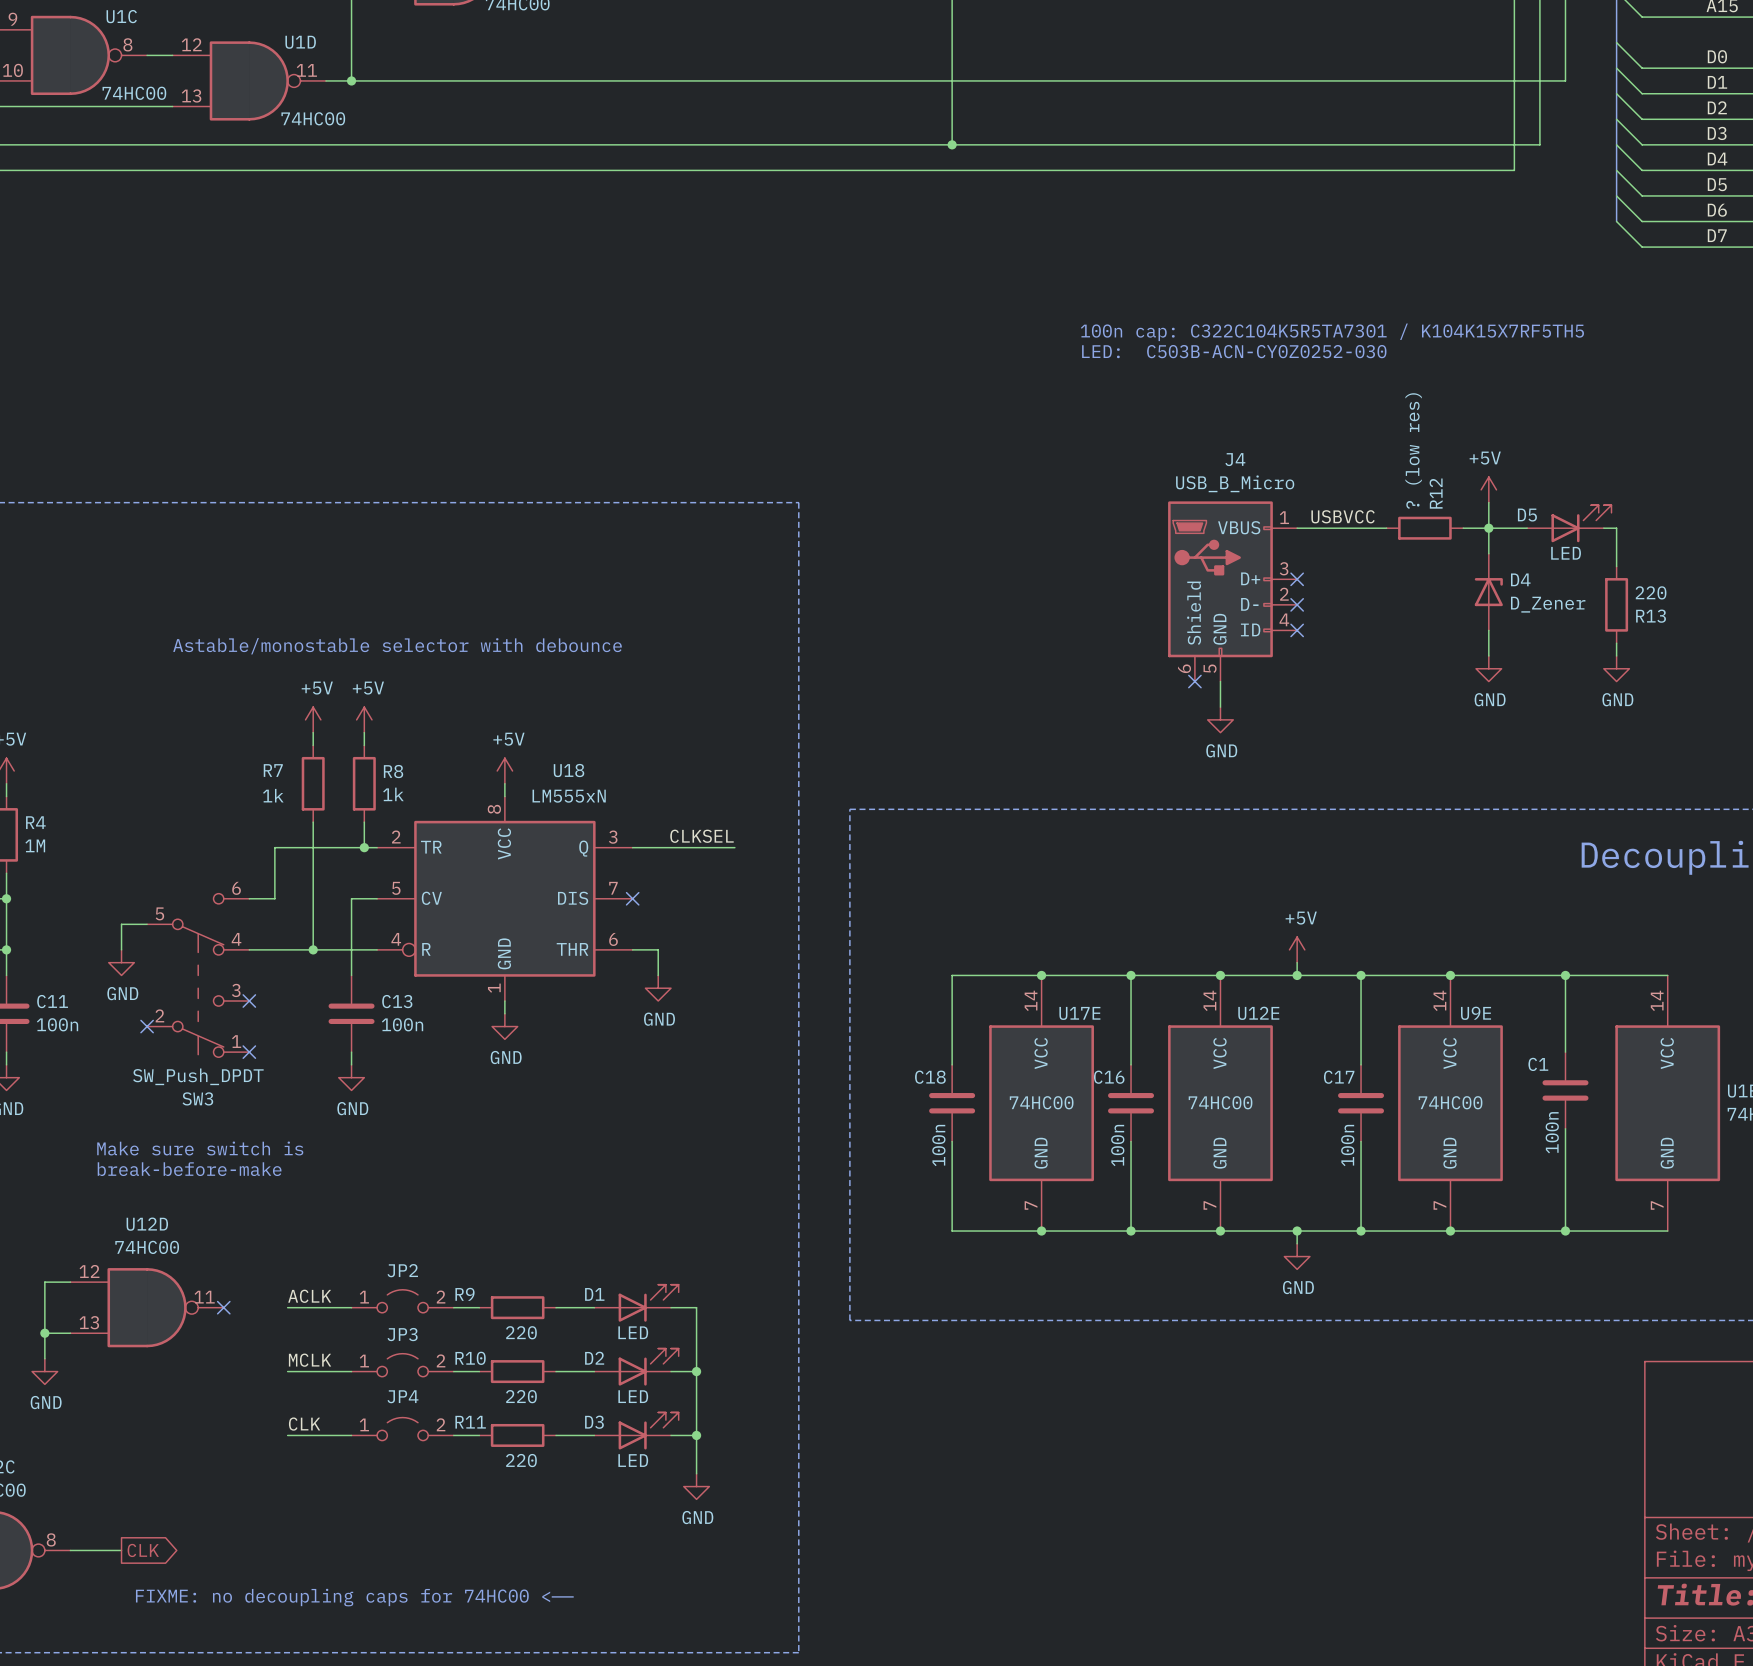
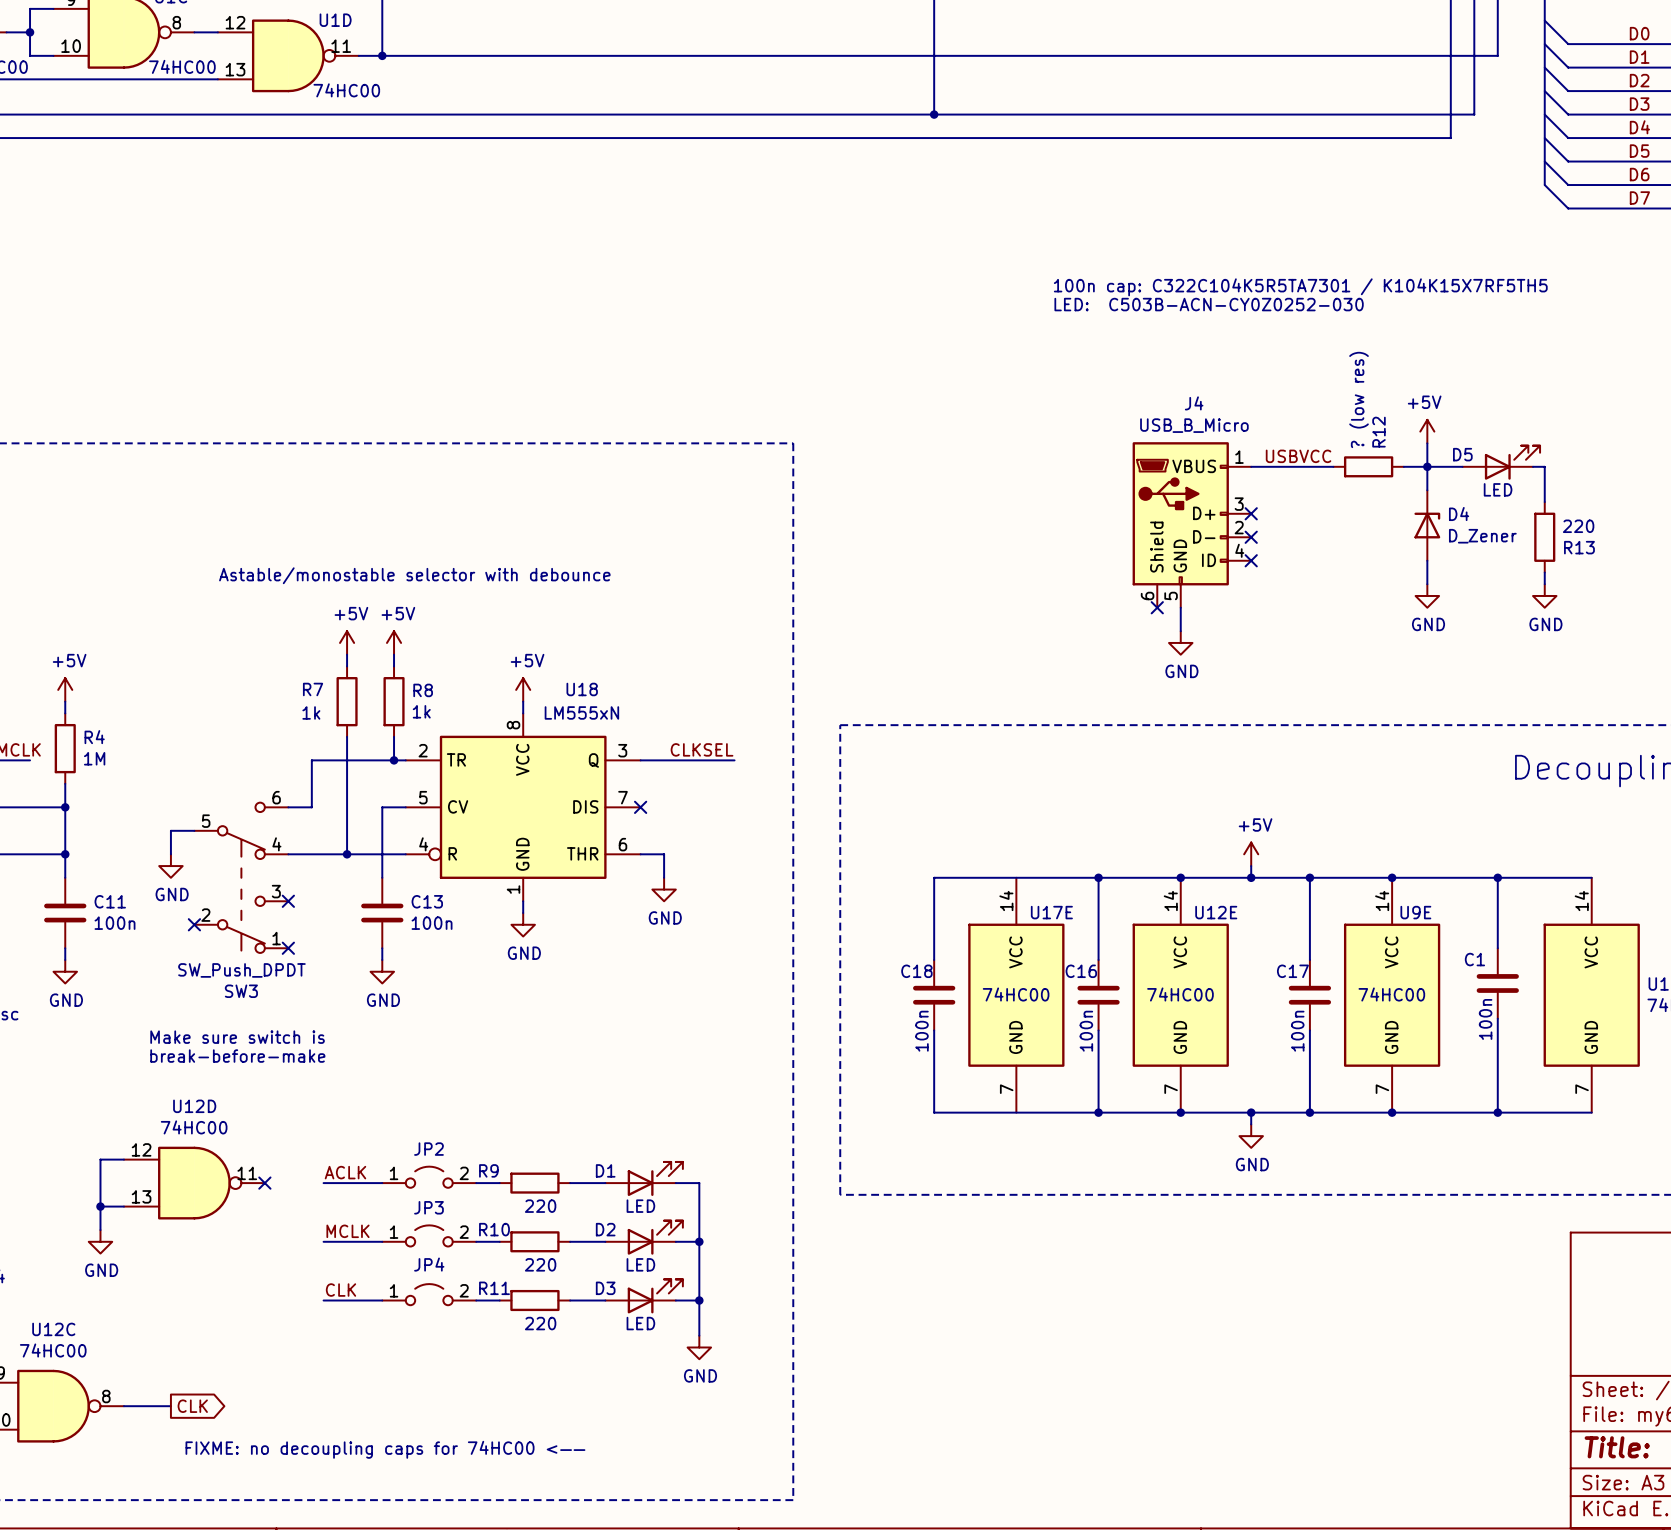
junction: (1041, 975) -> none
junction: (1041, 1231) -> none

